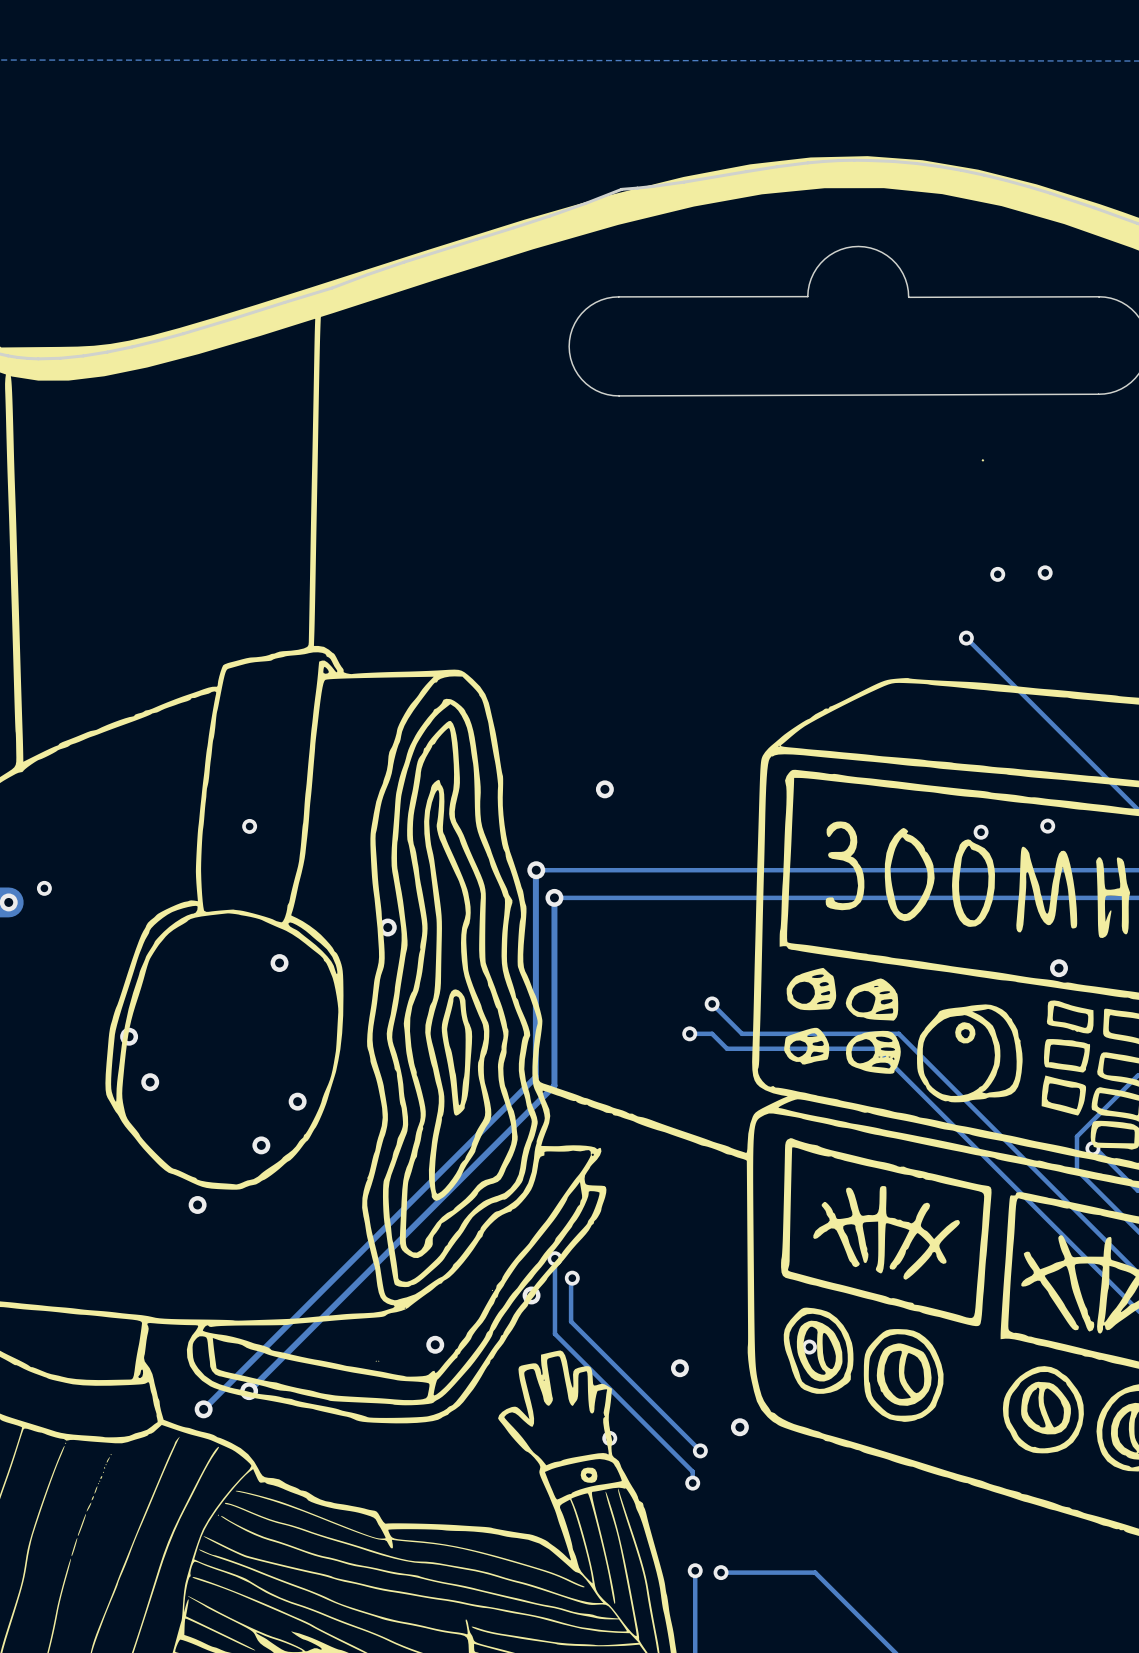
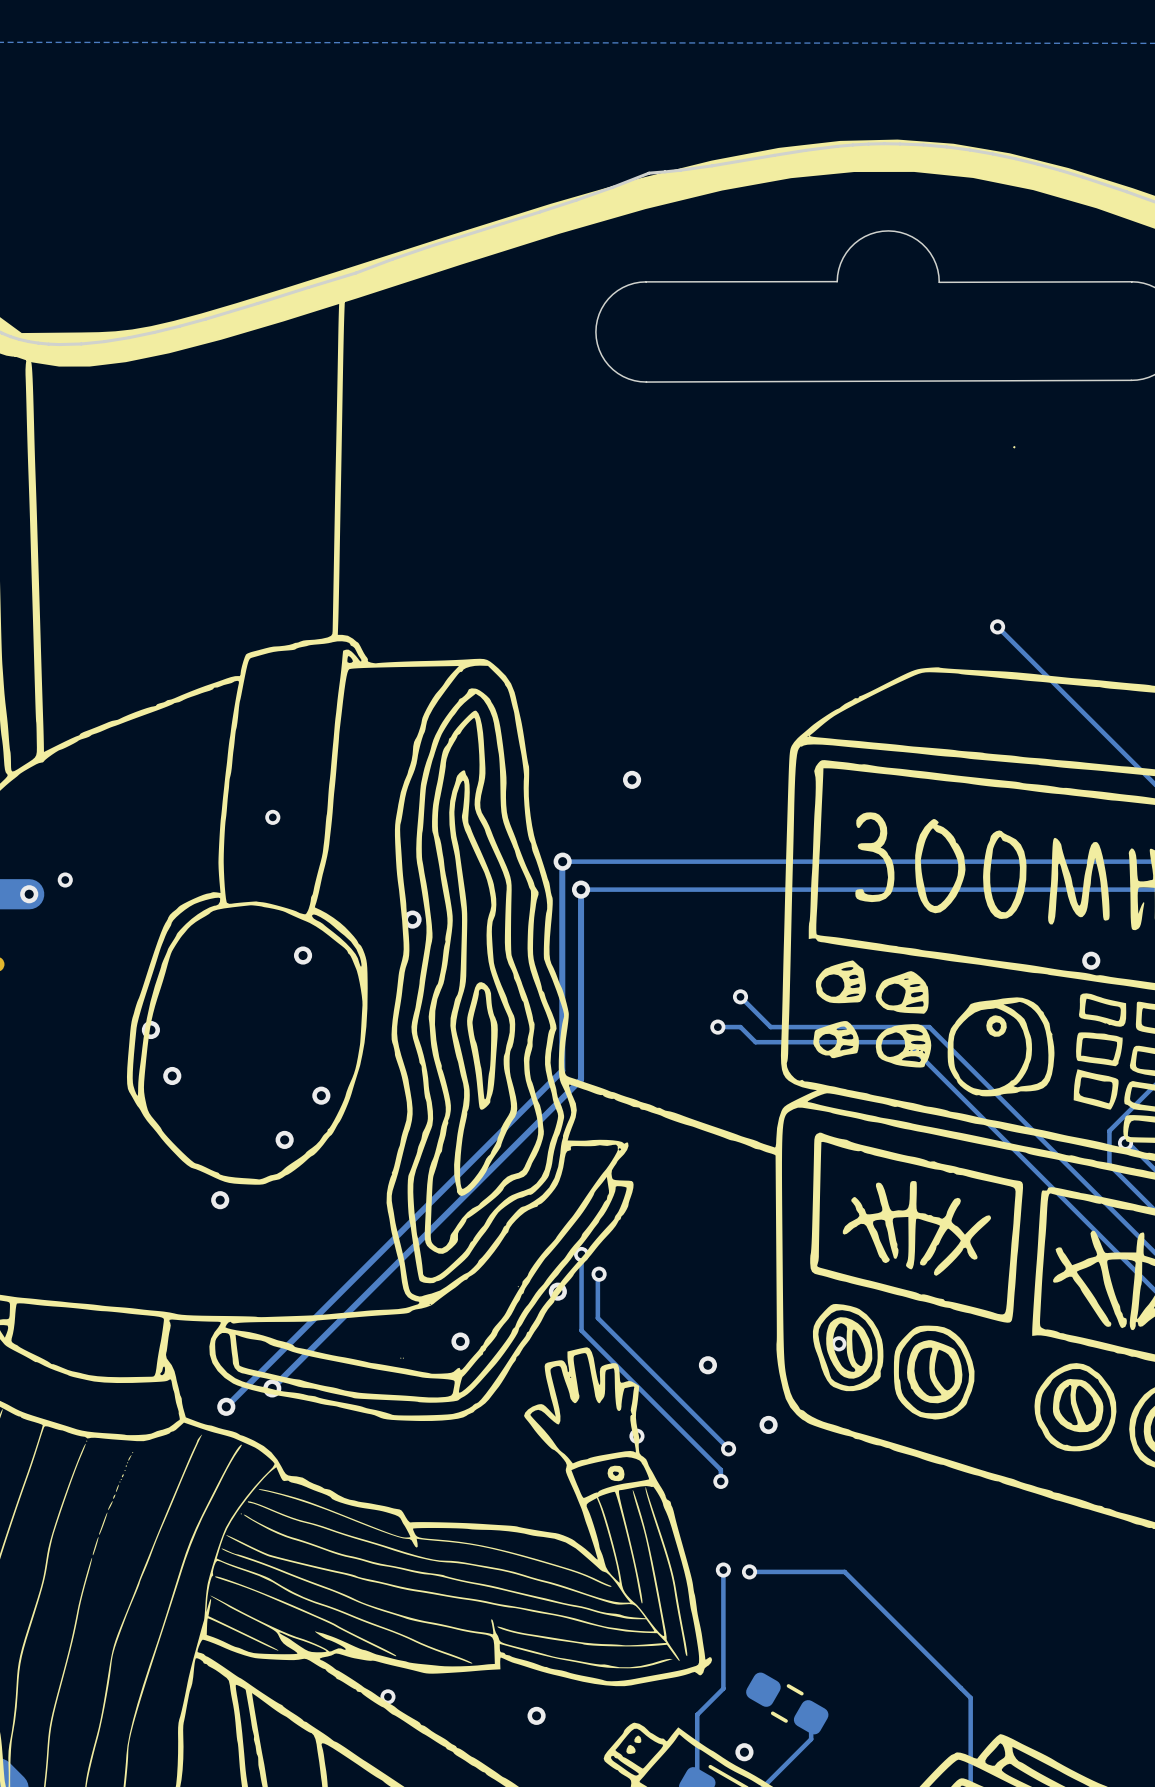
via: (1045, 572) -> none
via: (997, 574) -> none
via: (1047, 826) -> none
via: (981, 832) -> none

